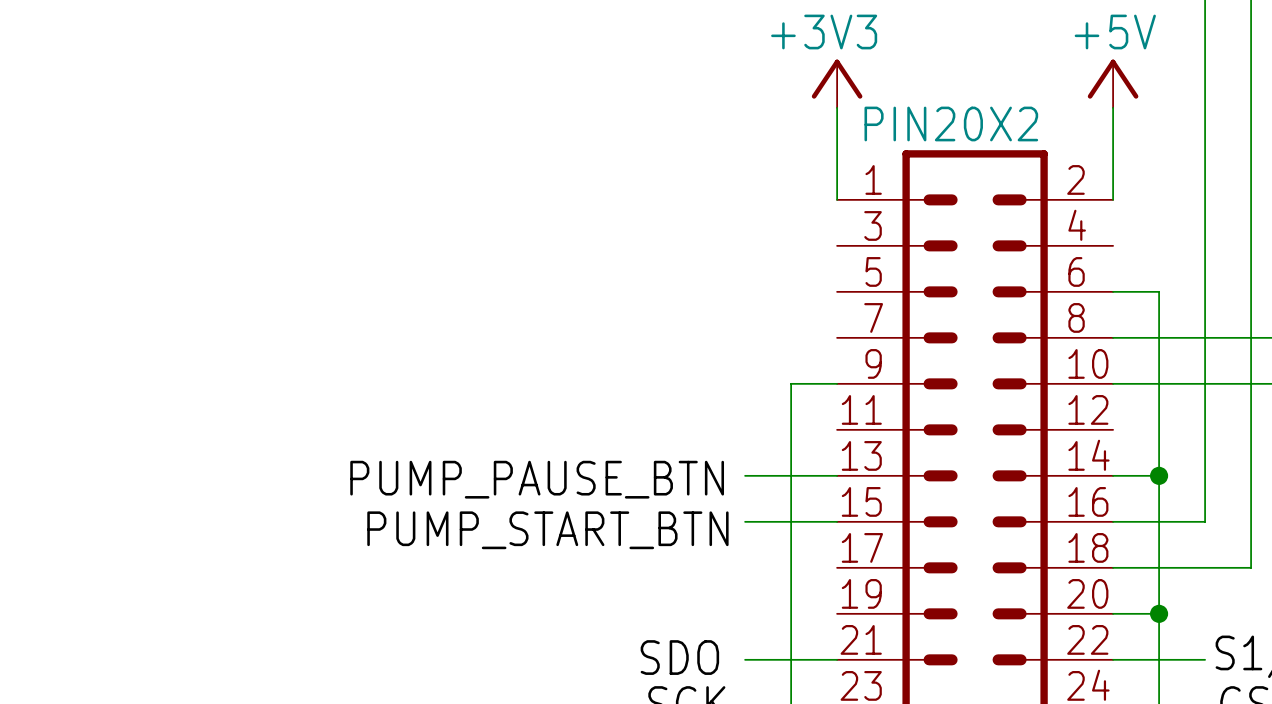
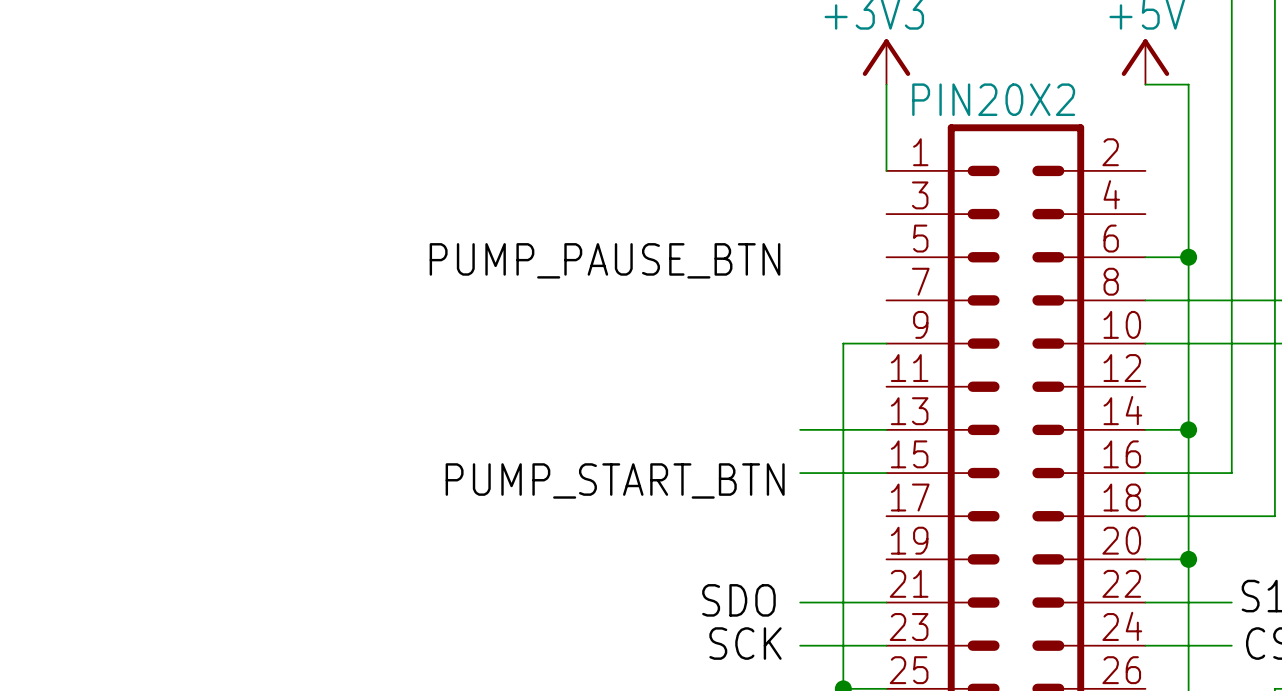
wire: (1113, 107) (1113, 199) -> (1145, 84) (1188, 84) (1188, 257)
junction: none -> (1188, 257)
label position: PUMP_PAUSE_BTN (537, 479) -> PUMP_PAUSE_BTN (605, 260)

